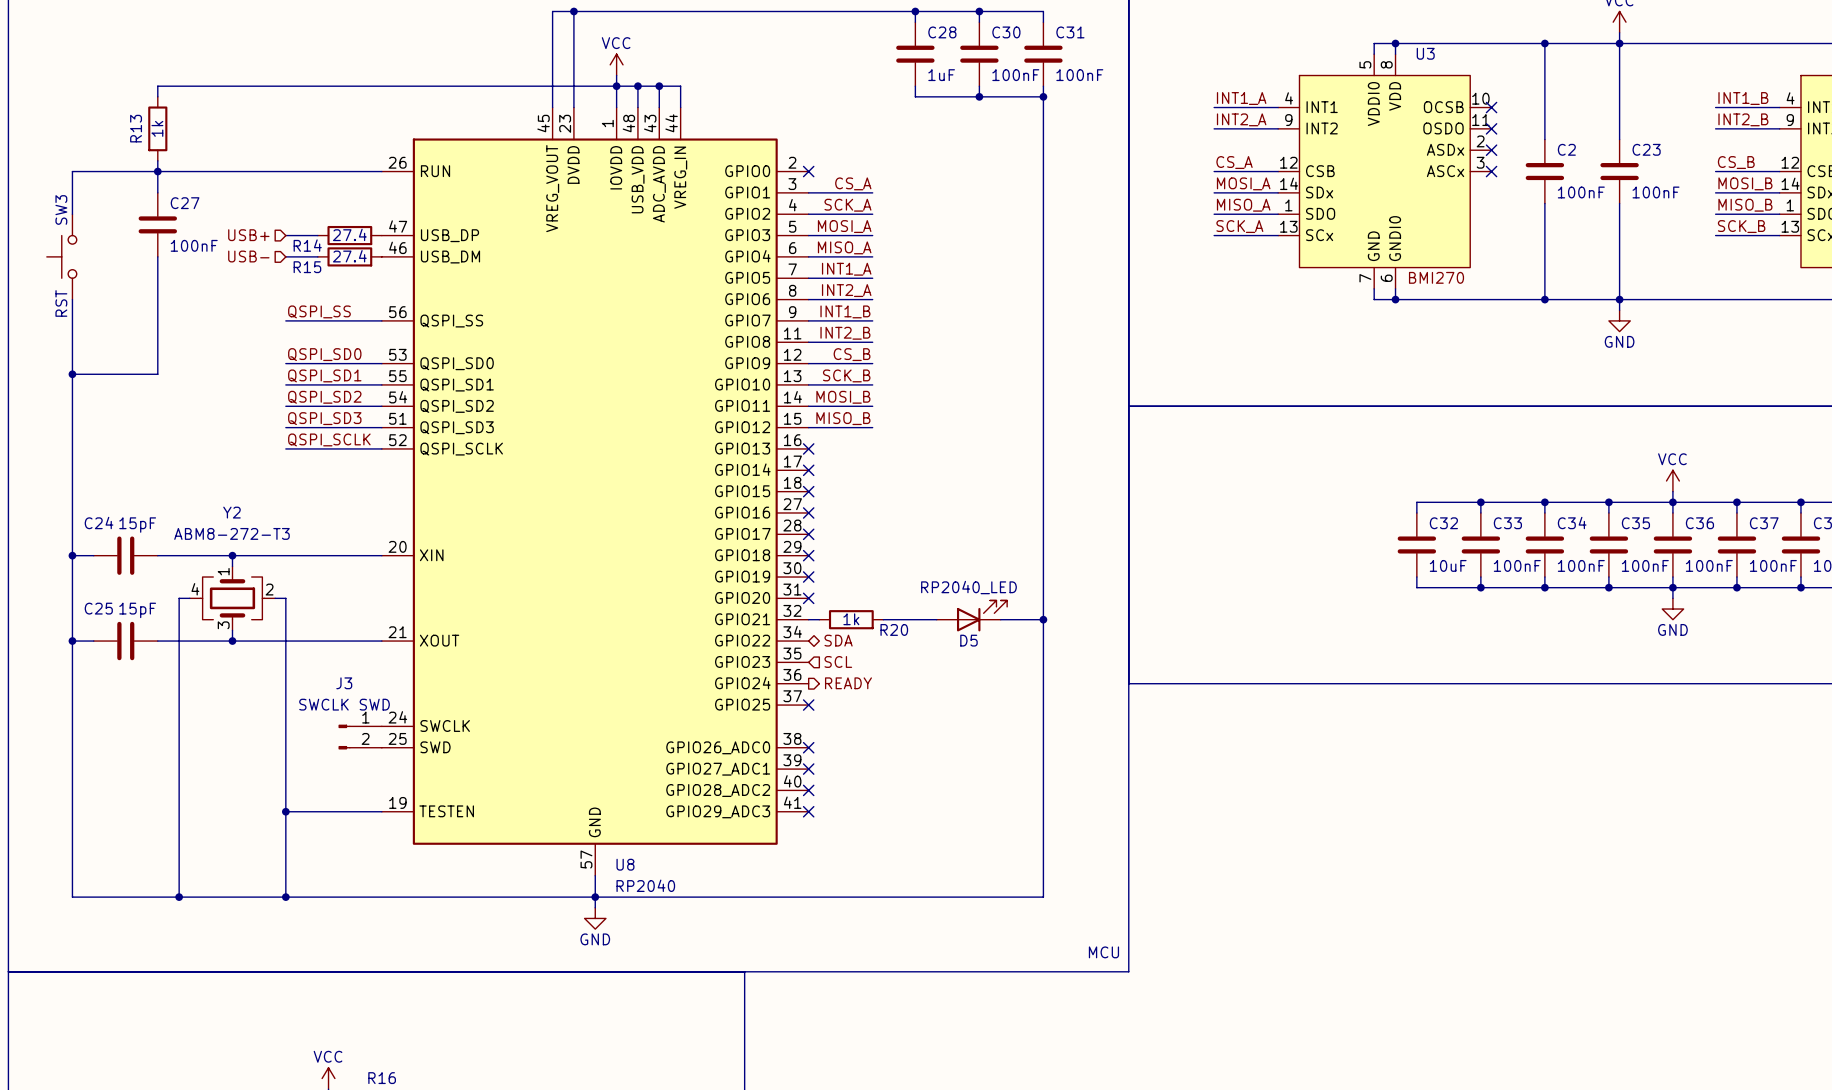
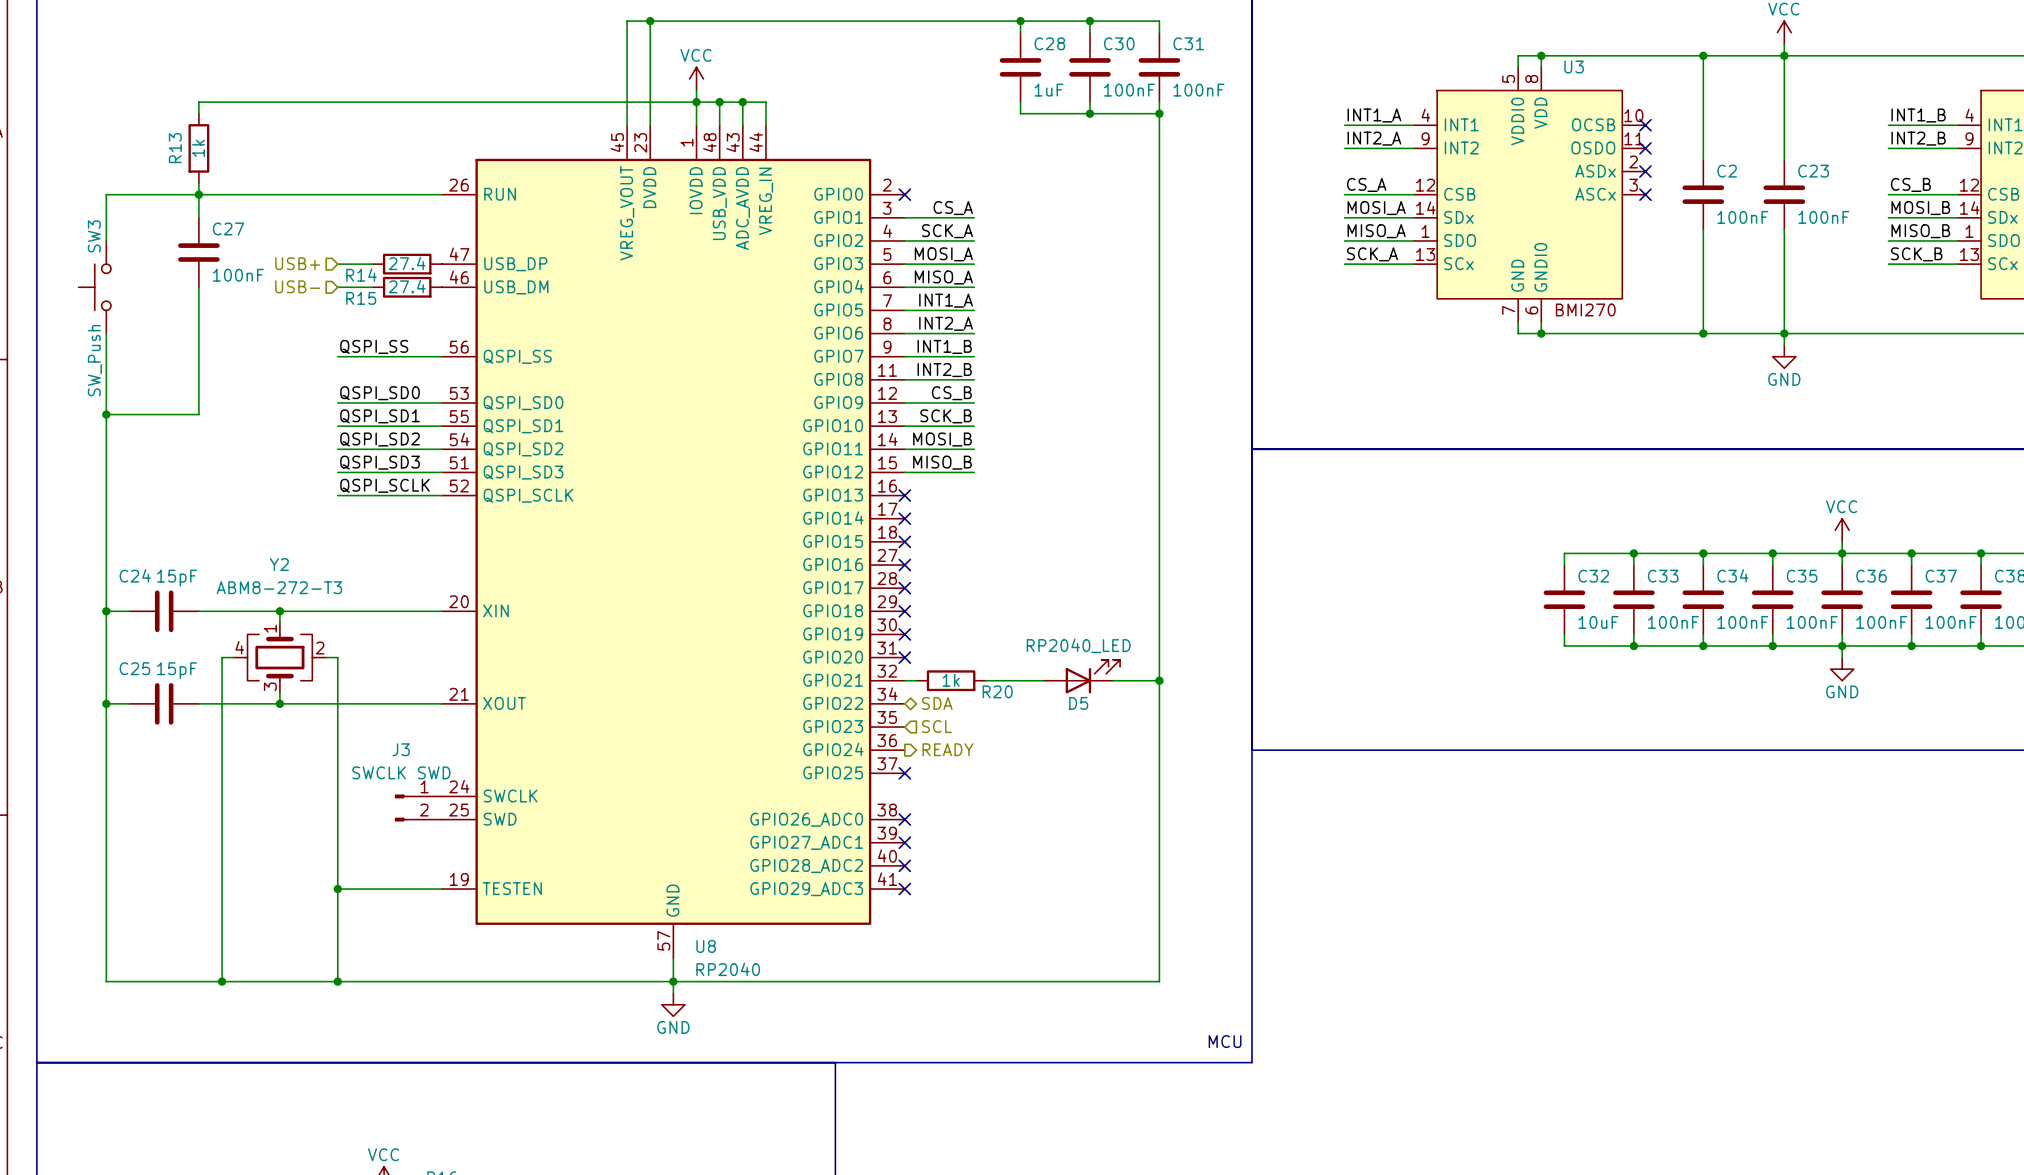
SW3 value: RST (61, 303) -> SW_Push (94, 360)

